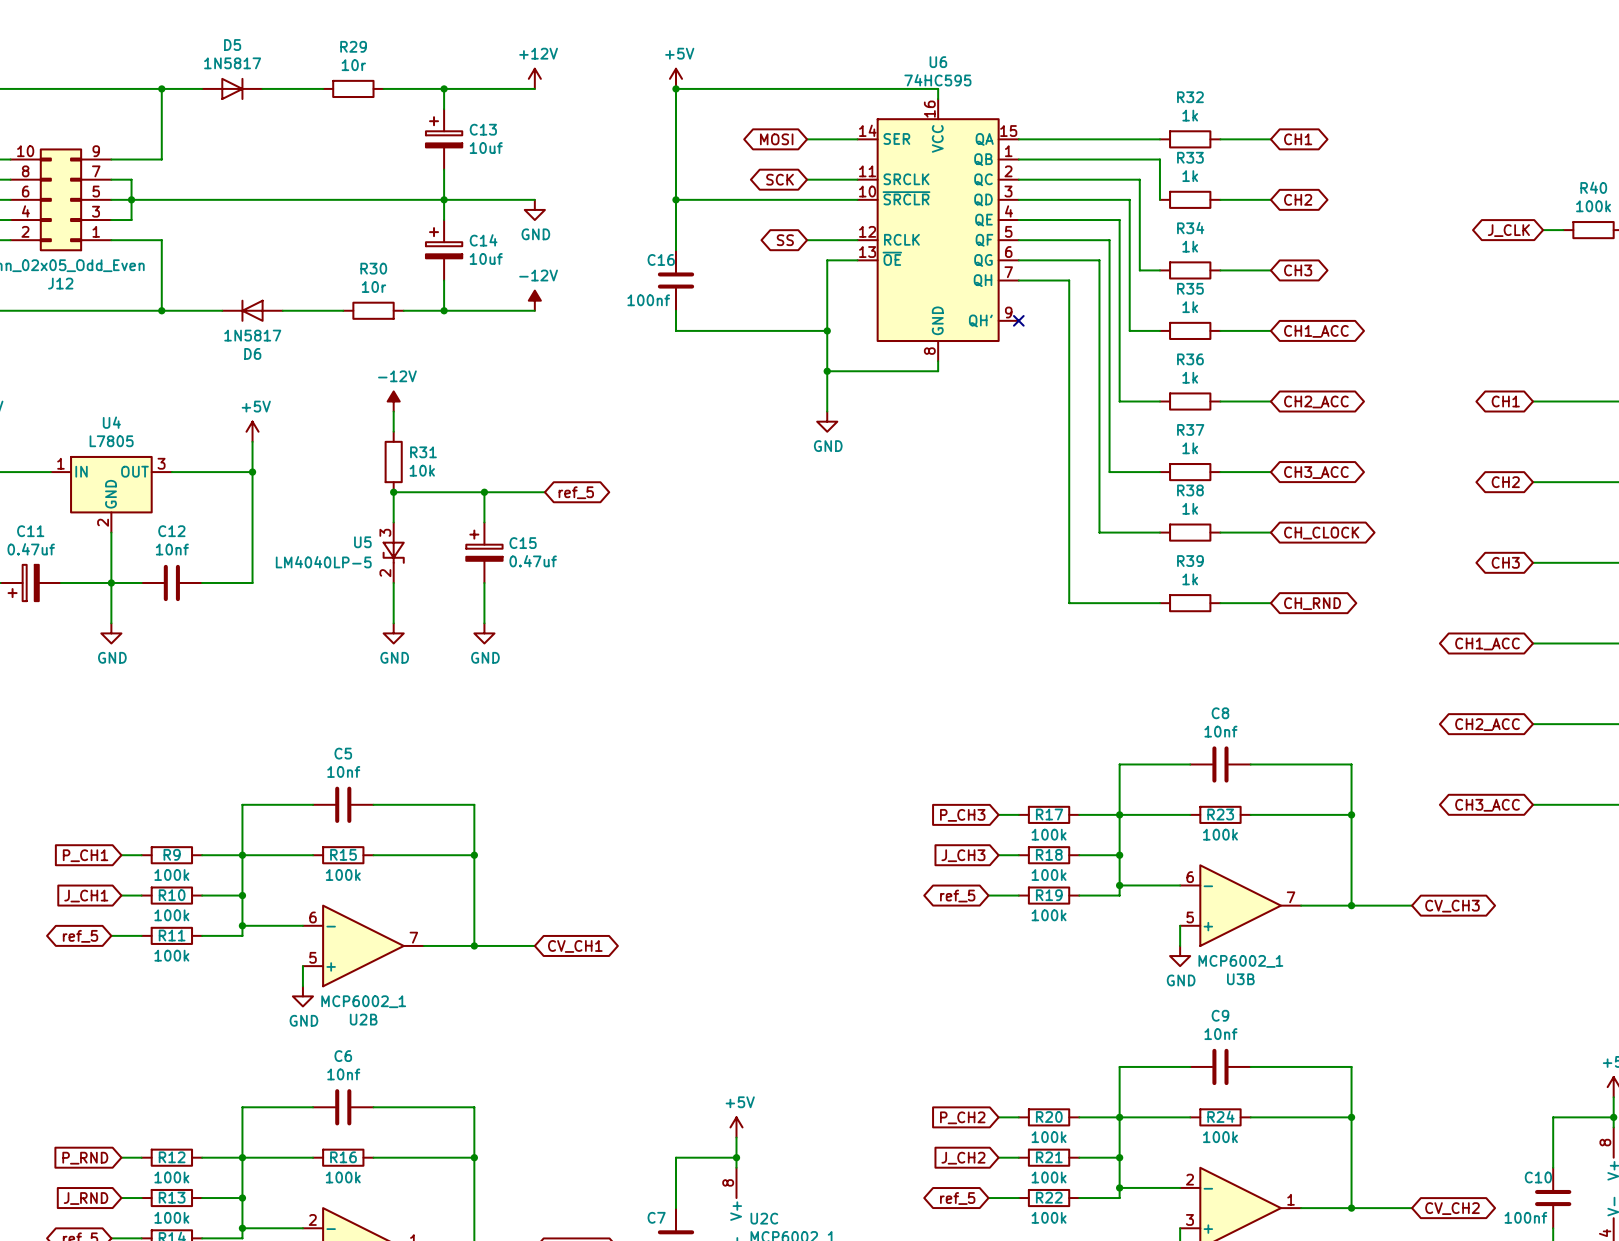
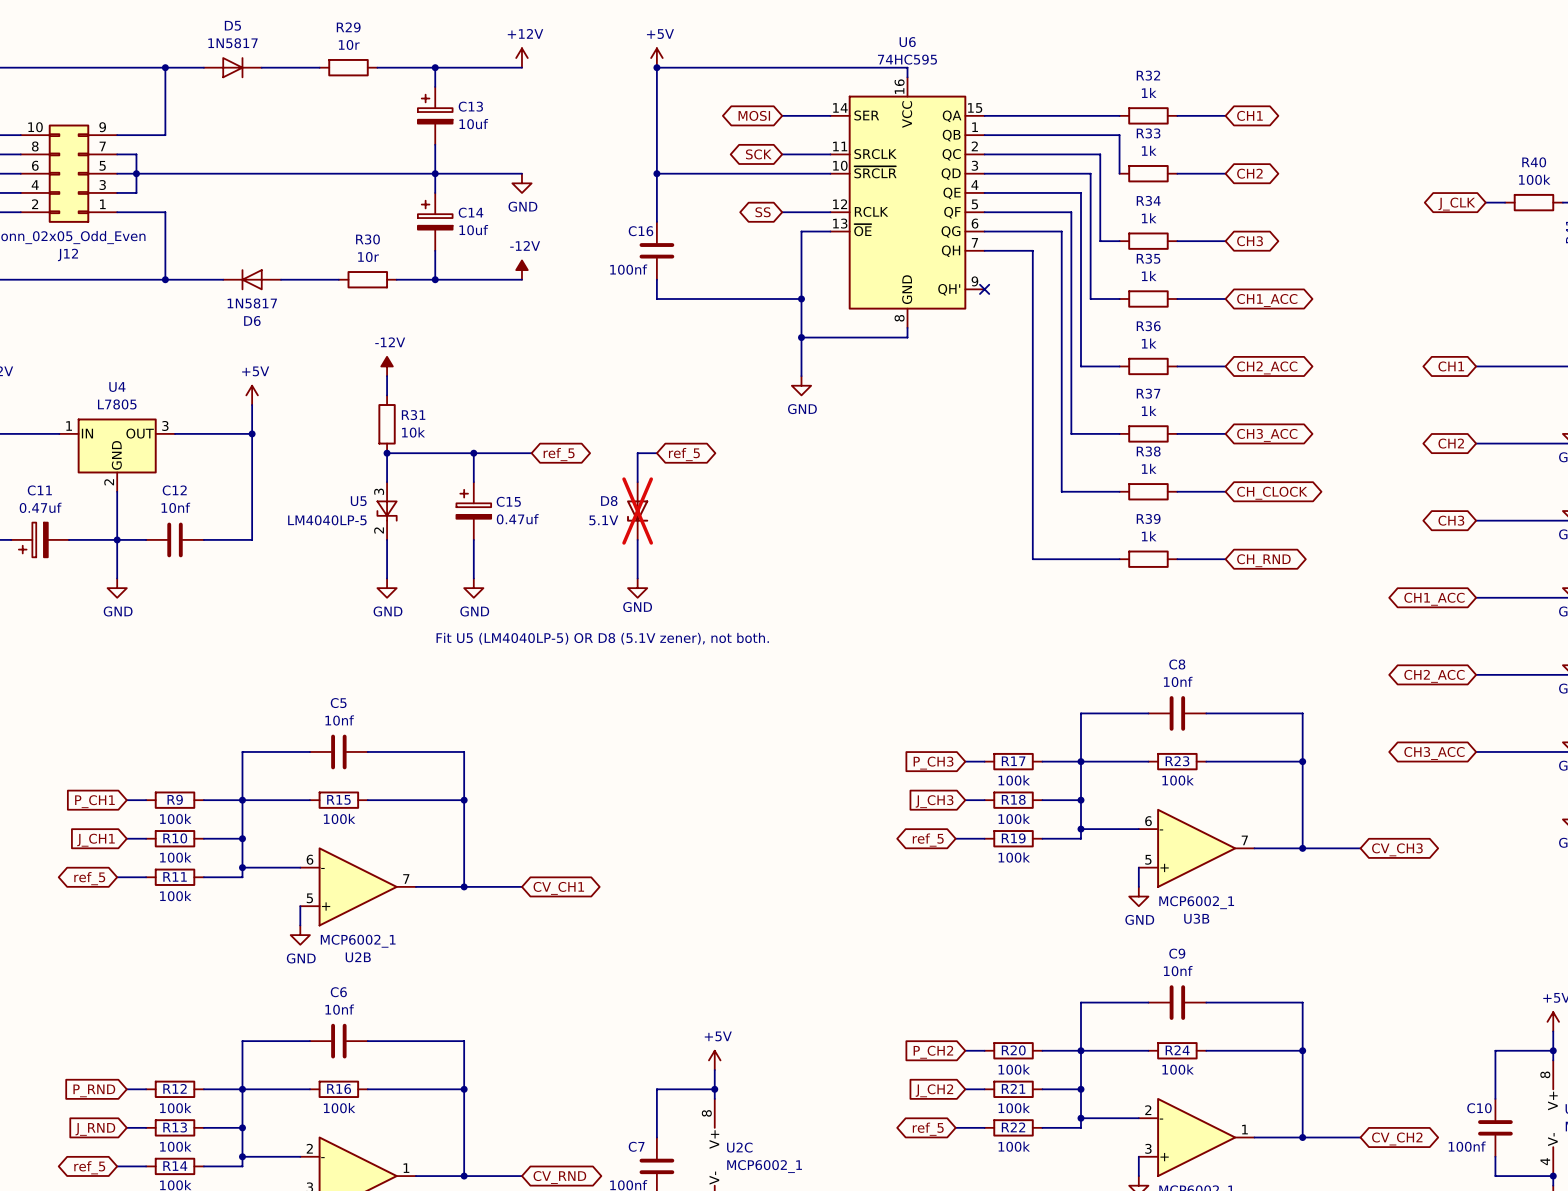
wire: none -> (656, 453) (637, 453) (637, 482)
global label: none -> ref_5 (684, 454)
D8: none -> 5.1V (637, 511)
wire: none -> (637, 539) (637, 578)
power symbol: none -> GND (637, 588)
text: none -> Fit U5 (LM4040LP-5) OR D8 (5.1V zener), not both. (602, 638)

